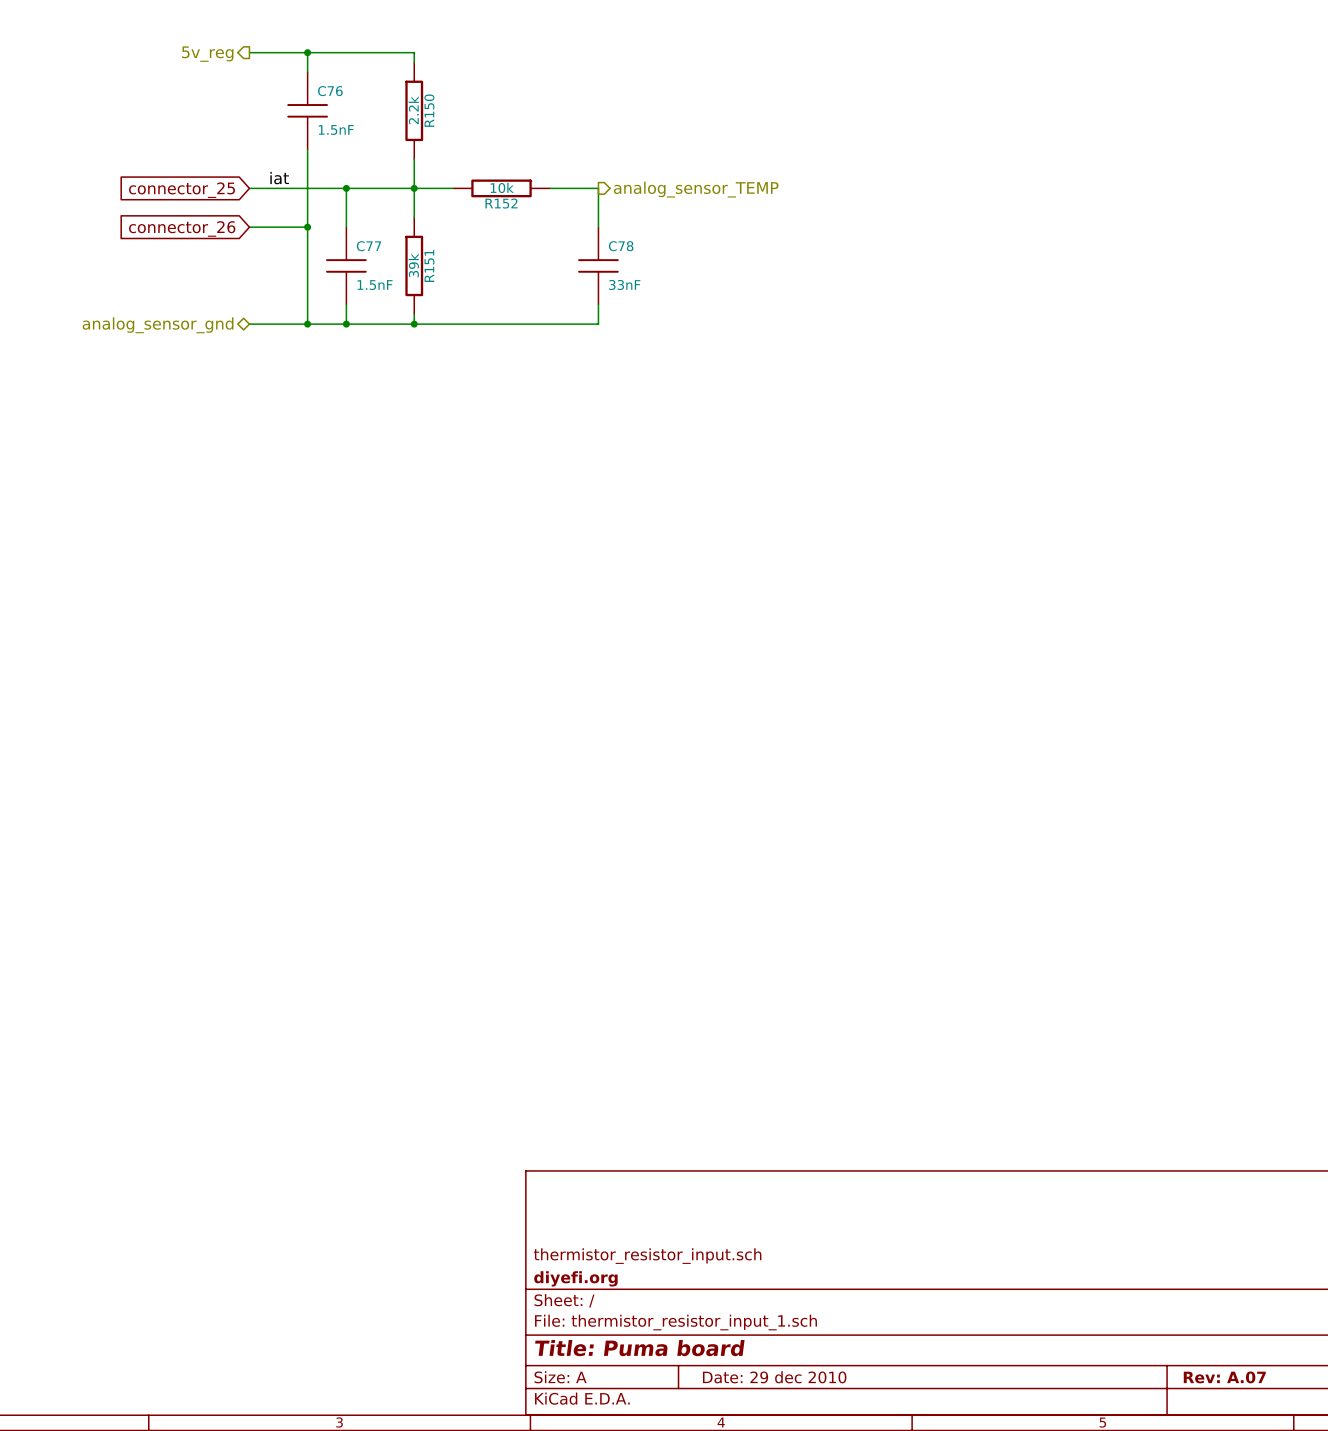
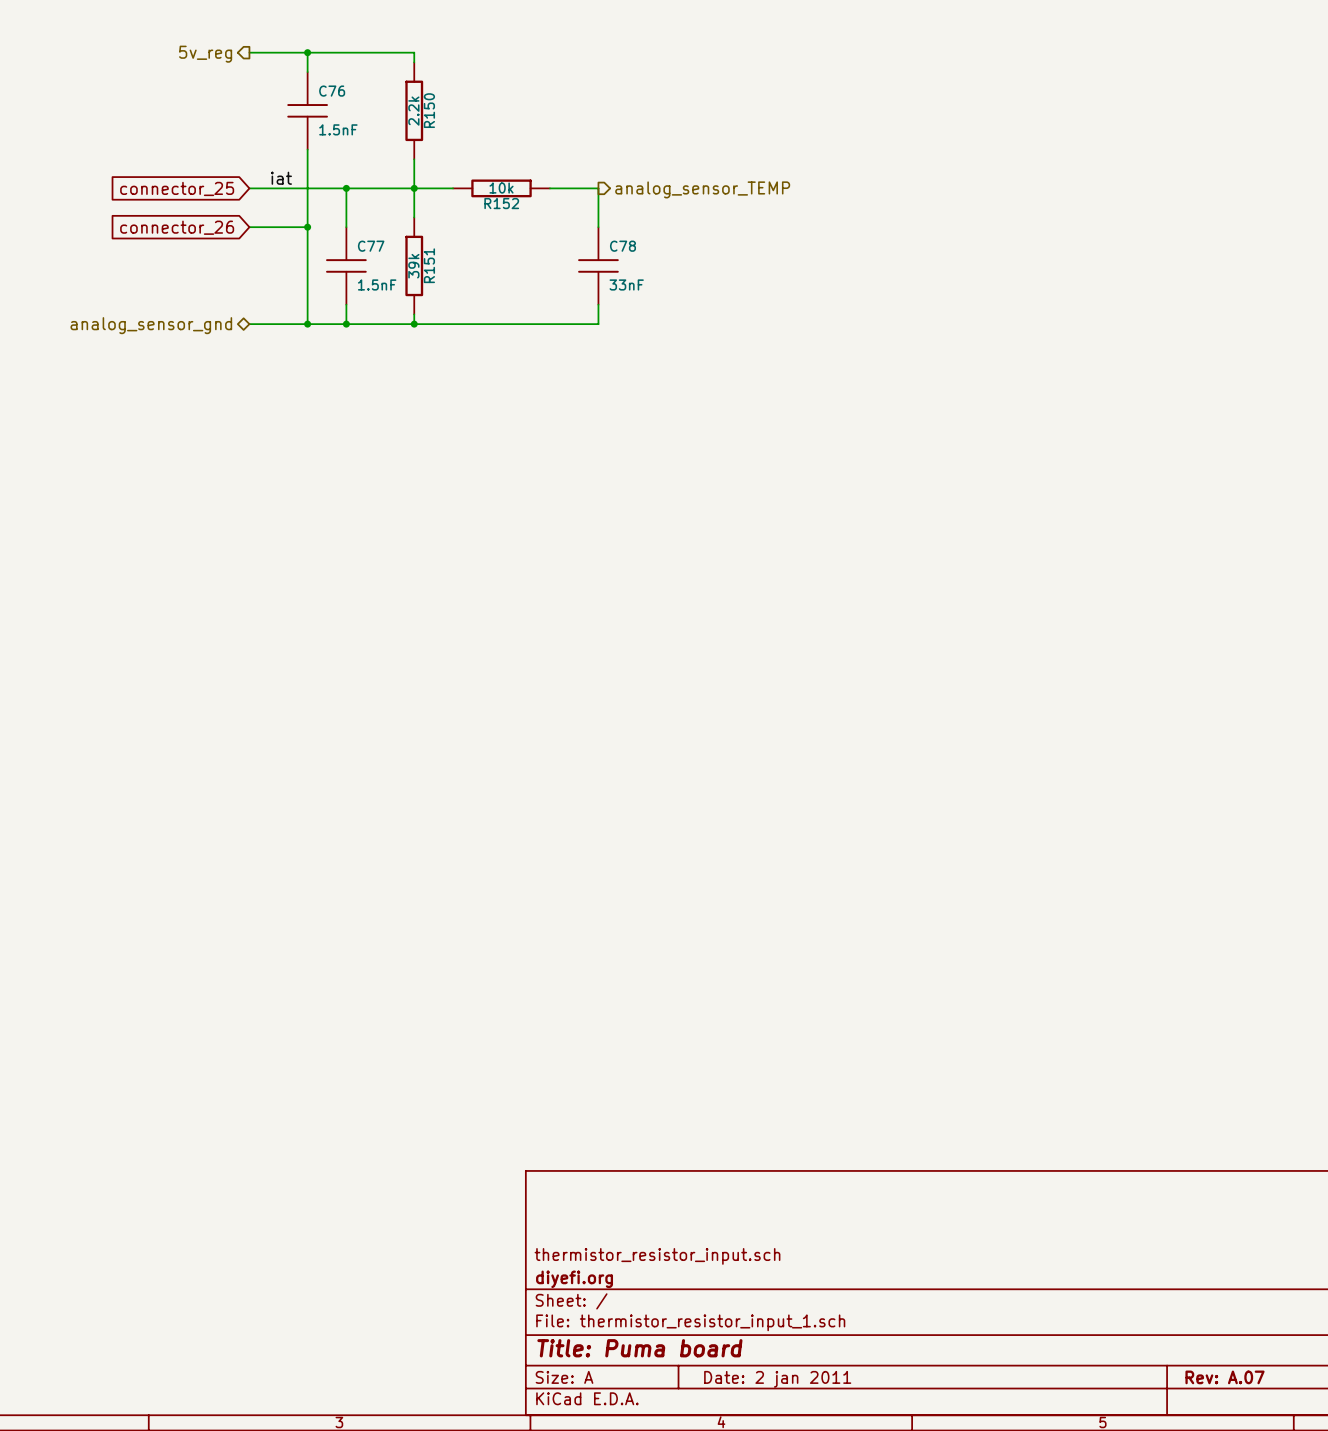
title block: Date: 29 dec 2010 (774, 1377) -> Date: 2 jan 2011 (777, 1379)

